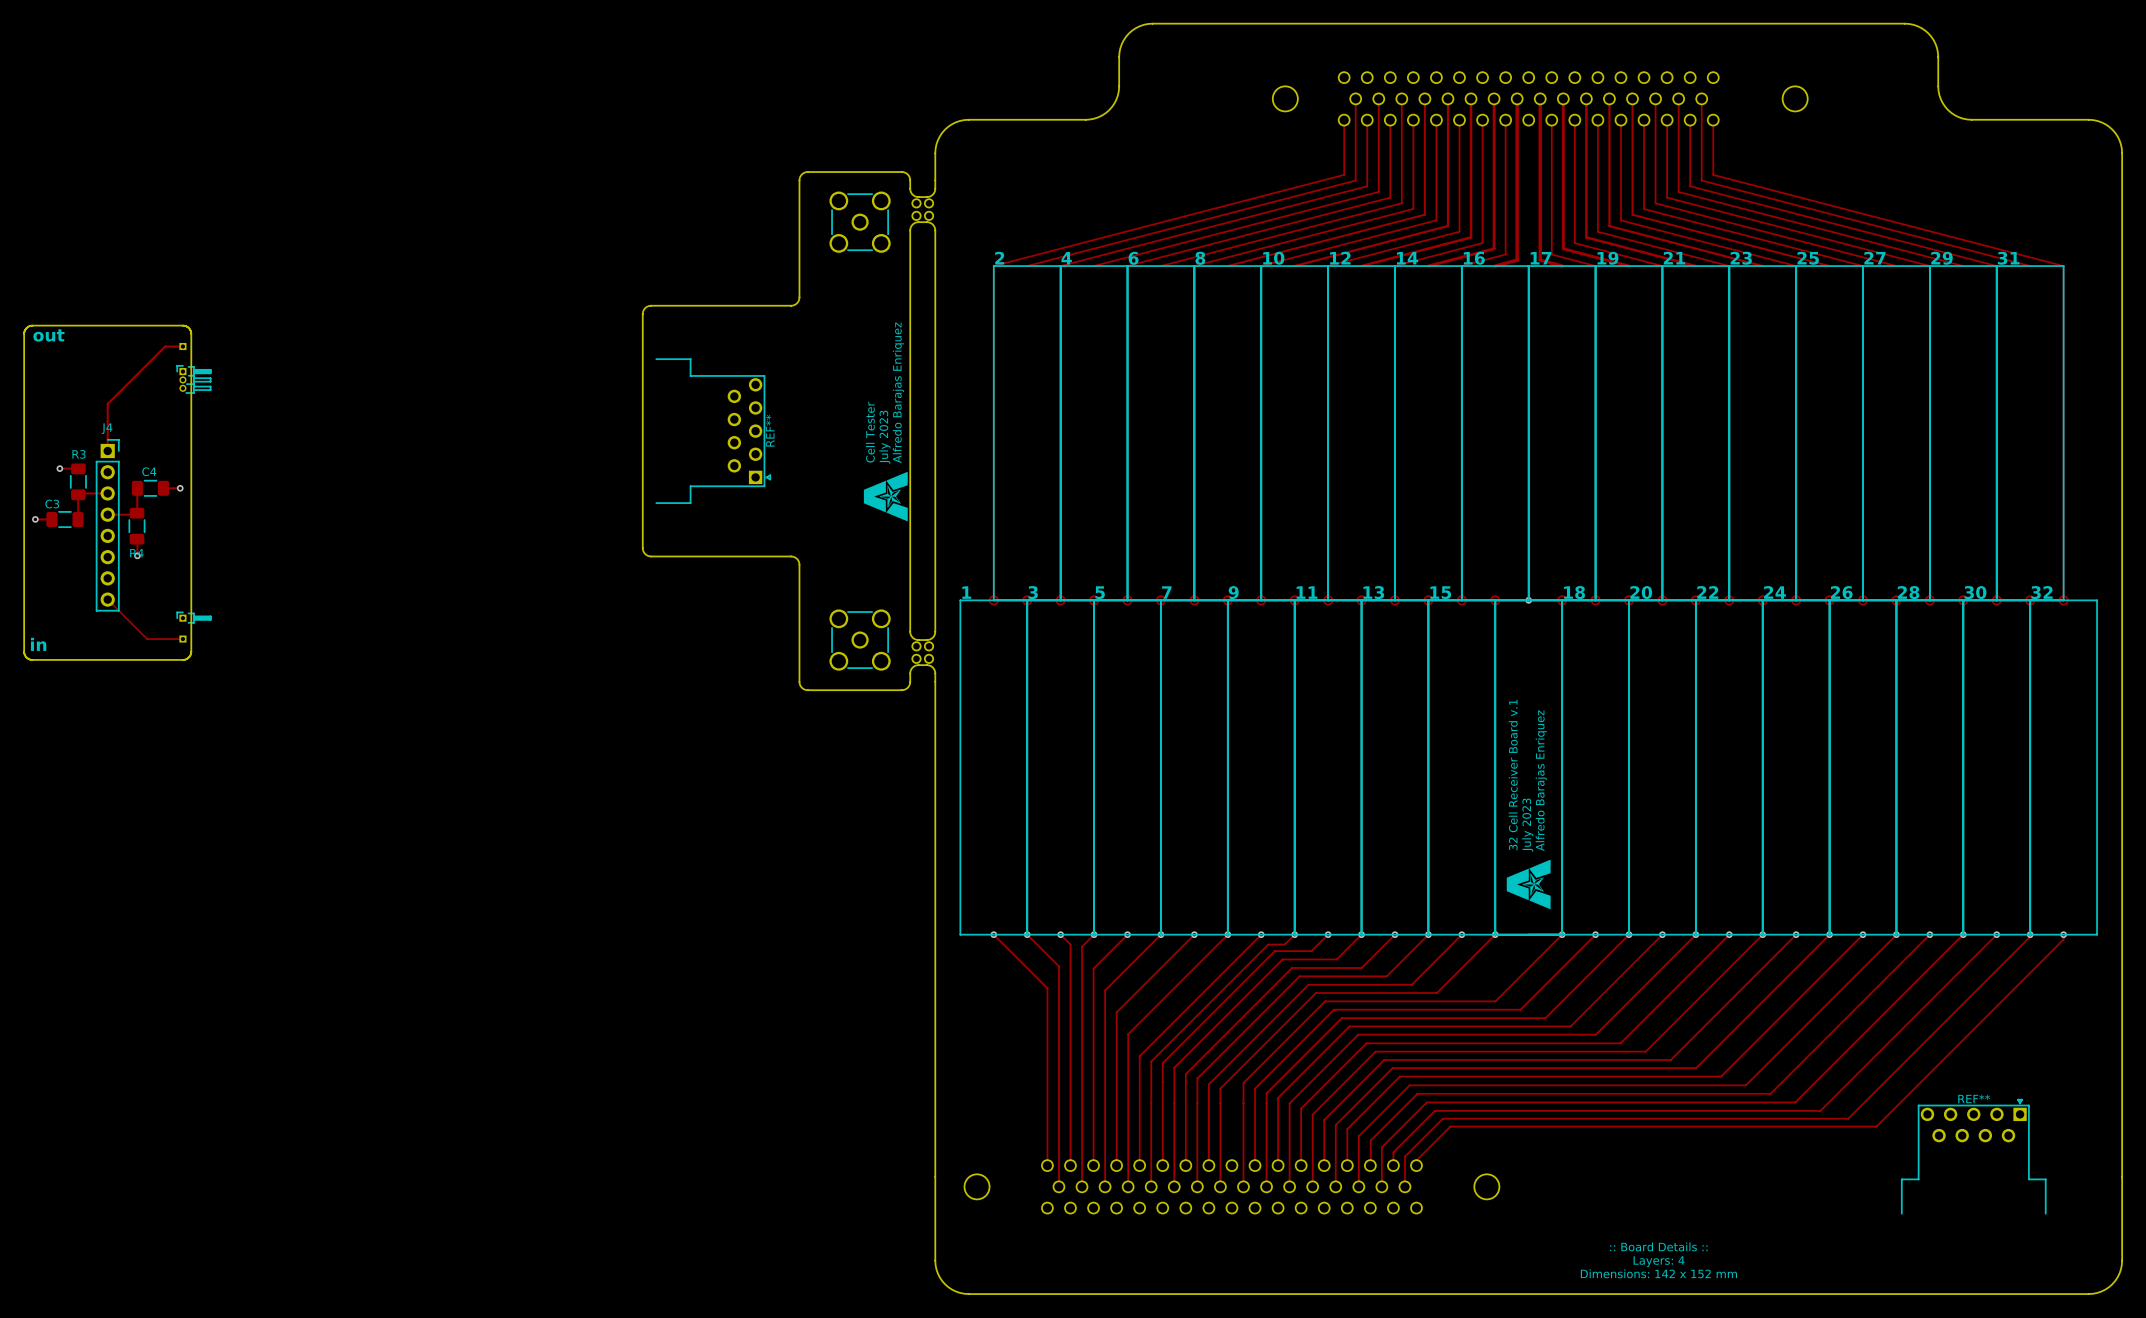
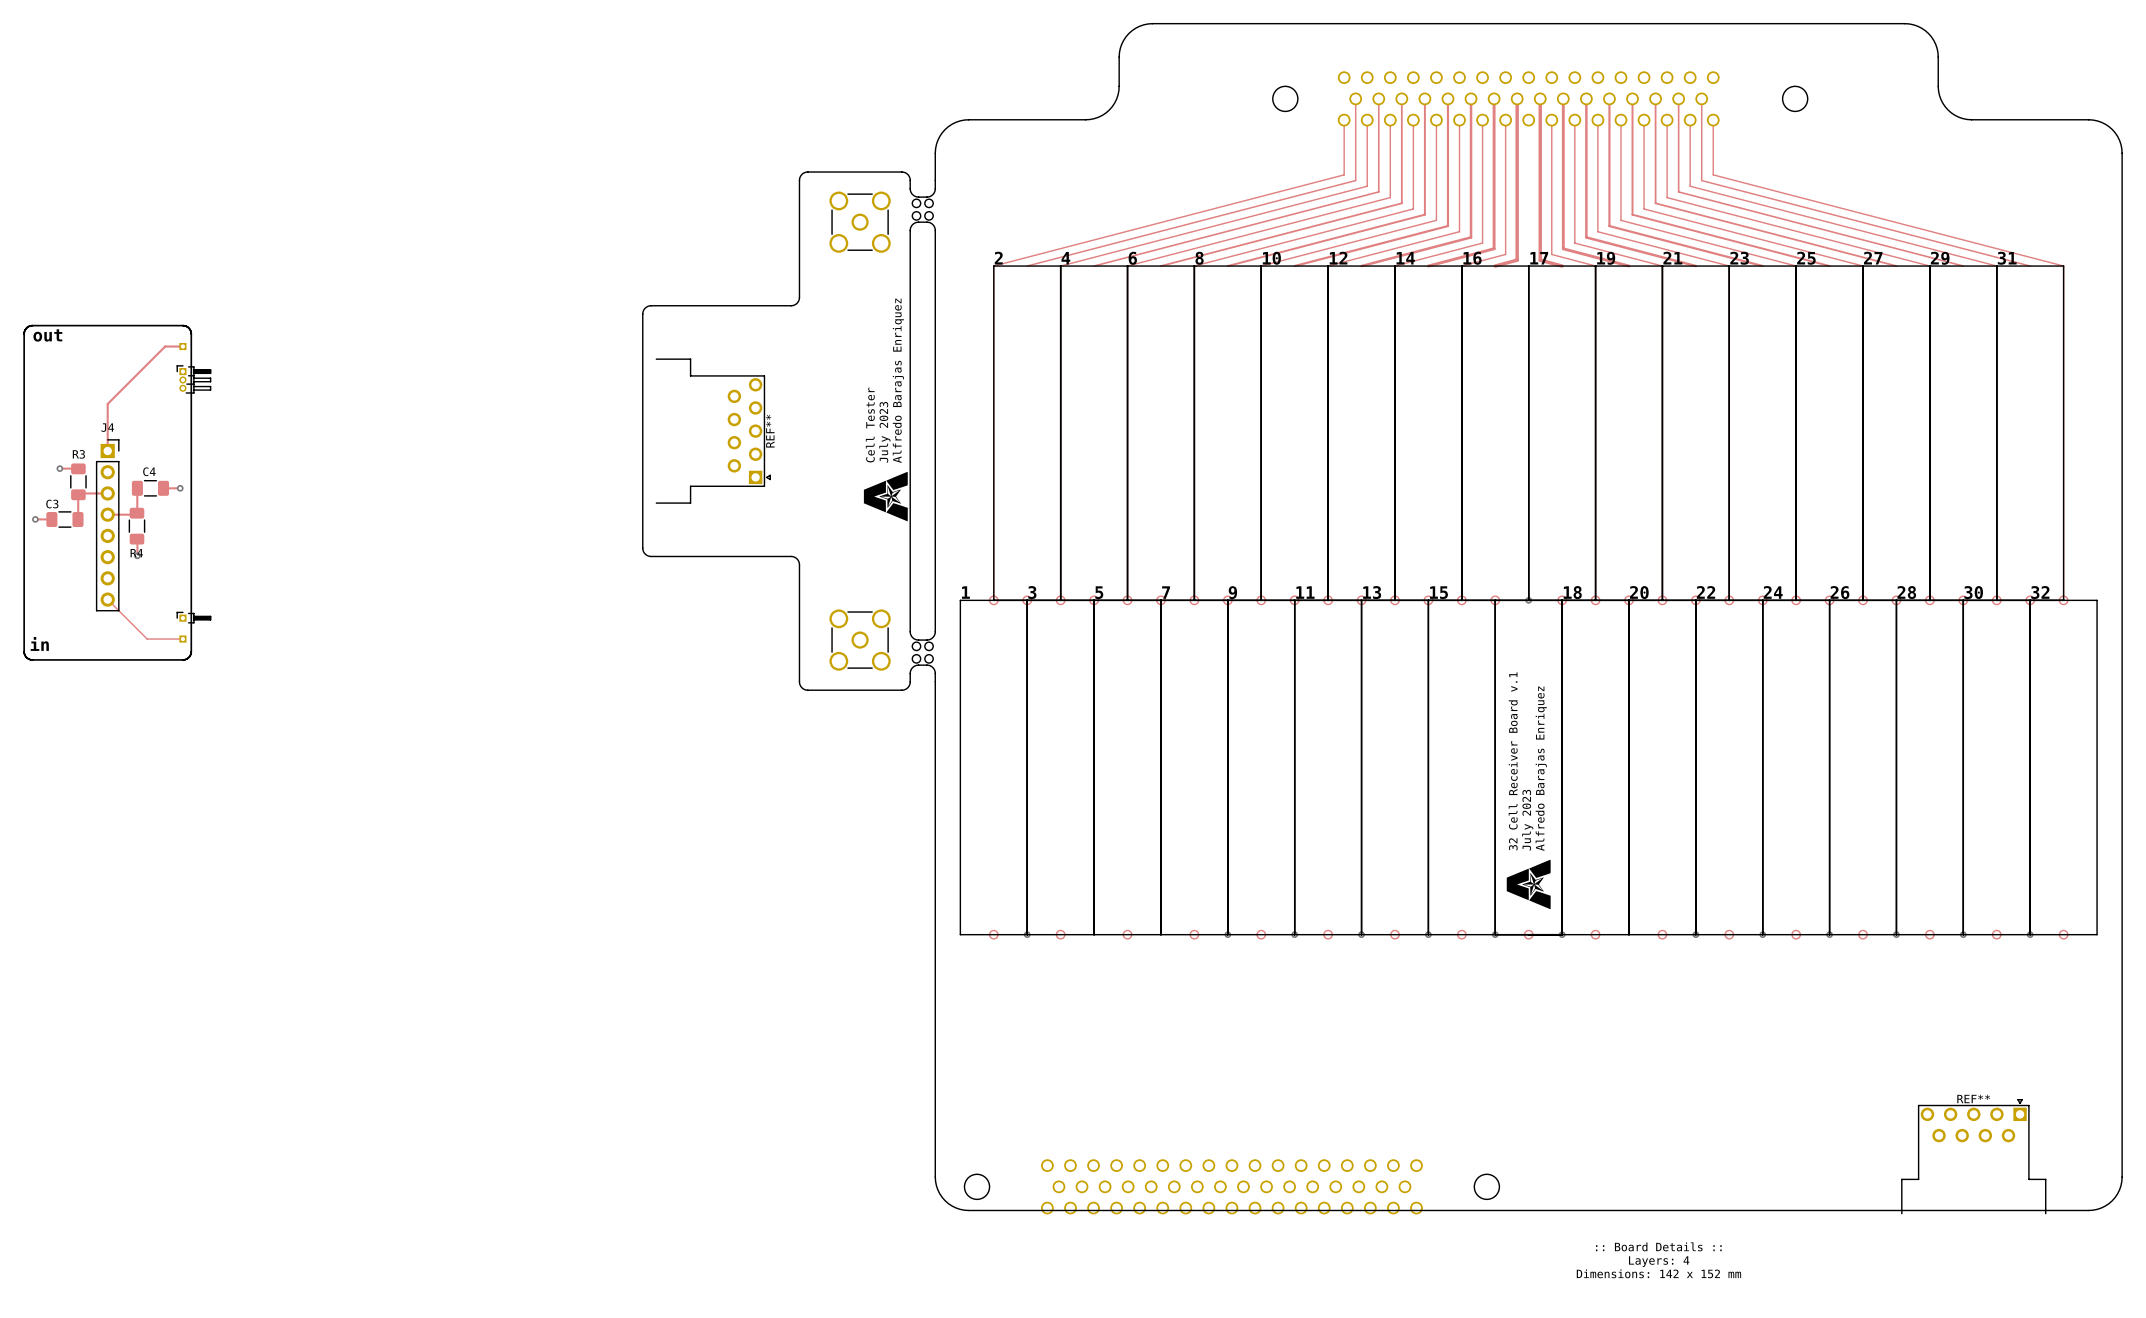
track: (1027, 600) (1027, 934) (1058, 966) (1058, 1186) -> none
track: (1094, 600) (1094, 934) (1082, 946) (1082, 1186) -> none
track: (1160, 600) (1160, 934) (1105, 990) (1105, 1186) -> none
track: (1227, 600) (1227, 934) (1128, 1034) (1128, 1186) -> none
track: (1294, 600) (1294, 934) (1284, 944) (1268, 944) (1151, 1061) (1151, 1103) -> none
track: (1361, 600) (1361, 934) (1336, 959) (1282, 959) (1174, 1067) (1174, 1103) -> none
track: (1428, 600) (1428, 934) (1386, 976) (1299, 976) (1197, 1078) (1197, 1103) -> none
track: (1495, 600) (1495, 934) (1436, 993) (1316, 993) (1220, 1088) (1220, 1186) -> none
track: (1562, 600) (1562, 934) (1495, 1001) (1325, 1001) (1243, 1082) (1243, 1103) -> none
track: (1762, 600) (1762, 934) (1645, 1051) (1375, 1051) (1312, 1114) (1312, 1186) -> none
track: (1829, 600) (1829, 934) (1696, 1068) (1392, 1068) (1335, 1125) (1335, 1186) -> none
track: (1896, 600) (1896, 934) (1745, 1085) (1409, 1085) (1358, 1136) (1358, 1186) -> none
track: (1963, 600) (1963, 934) (1795, 1102) (1426, 1102) (1381, 1147) (1381, 1186) -> none
track: (2030, 600) (2030, 936) (1848, 1118) (1442, 1118) (1404, 1156) (1404, 1186) -> none
drawing: none -> [988, 929, 999, 940]
drawing: none -> [1055, 929, 1066, 940]
drawing: none -> [1122, 929, 1133, 940]
drawing: none -> [1189, 929, 1200, 940]
drawing: none -> [1256, 929, 1267, 940]
drawing: none -> [1323, 929, 1333, 940]
drawing: none -> [1390, 929, 1400, 940]
drawing: none -> [1457, 929, 1467, 940]
drawing: none -> [1523, 929, 1534, 940]
drawing: none -> [1590, 929, 1601, 940]
drawing: none -> [1657, 929, 1668, 940]
drawing: none -> [1724, 929, 1735, 940]
drawing: none -> [1791, 929, 1801, 940]
drawing: none -> [1858, 929, 1868, 940]
drawing: none -> [1925, 929, 1935, 940]
drawing: none -> [1991, 929, 2002, 940]
drawing: none -> [2058, 929, 2069, 940]
track: (993, 934) (1047, 988) (1047, 1165) -> none
via: (993, 934) -> none
track: (1060, 934) (1070, 944) (1070, 1165) -> none
via: (1060, 934) -> none
via: (1094, 934) -> none
track: (1127, 934) (1093, 968) (1093, 1165) -> none
via: (1127, 934) -> none
via: (1160, 934) -> none
track: (1194, 934) (1116, 1012) (1116, 1165) -> none
via: (1194, 934) -> none
track: (1261, 934) (1139, 1056) (1139, 1165) -> none
via: (1261, 934) -> none
track: (1327, 934) (1311, 951) (1274, 951) (1162, 1063) (1162, 1082) -> none
via: (1328, 934) -> none
track: (1394, 934) (1361, 967) (1292, 967) (1185, 1074) (1185, 1082) -> none
via: (1394, 934) -> none
track: (1461, 934) (1411, 984) (1308, 984) (1208, 1084) (1208, 1165) -> none
via: (1461, 934) -> none
via: (1595, 934) -> none
track: (1629, 934) (1545, 1018) (1341, 1018) (1266, 1093) (1266, 1103) -> none
via: (1629, 934) -> none
track: (1662, 934) (1570, 1026) (1349, 1026) (1278, 1097) (1278, 1165) -> none
via: (1662, 934) -> none
track: (1695, 934) (1595, 1034) (1358, 1034) (1289, 1103) (1289, 1186) -> none
track: (1729, 934) (1620, 1043) (1366, 1043) (1301, 1108) (1301, 1165) -> none
via: (1729, 934) -> none
track: (1796, 934) (1670, 1059) (1384, 1059) (1324, 1119) (1324, 1165) -> none
via: (1796, 934) -> none
track: (1863, 934) (1721, 1076) (1399, 1076) (1347, 1129) (1347, 1165) -> none
via: (1863, 934) -> none
track: (1929, 934) (1770, 1093) (1417, 1093) (1370, 1140) (1370, 1165) -> none
via: (1929, 934) -> none
track: (1996, 934) (1820, 1110) (1434, 1110) (1393, 1152) (1393, 1165) -> none
via: (1996, 934) -> none
track: (2063, 934) (2063, 939) (1876, 1126) (1450, 1126) (1416, 1160) (1416, 1165) -> none
via: (2063, 934) -> none
track: (1595, 935) (1520, 1009) (1334, 1009) (1255, 1088) (1255, 1165) -> none
track: (1162, 1082) (1162, 1165) -> none
track: (1185, 1082) (1185, 1165) -> none
track: (1151, 1103) (1151, 1186) -> none
track: (1174, 1103) (1174, 1186) -> none
track: (1197, 1103) (1197, 1186) -> none
track: (1243, 1103) (1243, 1186) -> none
track: (1266, 1103) (1266, 1186) -> none
board edge: (935, 1177) (936, 1269) (942, 1280) (948, 1287) (960, 1292) (968, 1294) (2093, 1293) (2109, 1287) (2115, 1280) (2120, 1269) (2122, 1177) -> (935, 1177) (937, 1189) (945, 1200) (955, 1207) (968, 1210) (2088, 1210) (2101, 1207) (2112, 1200) (2119, 1189) (2122, 1177)

